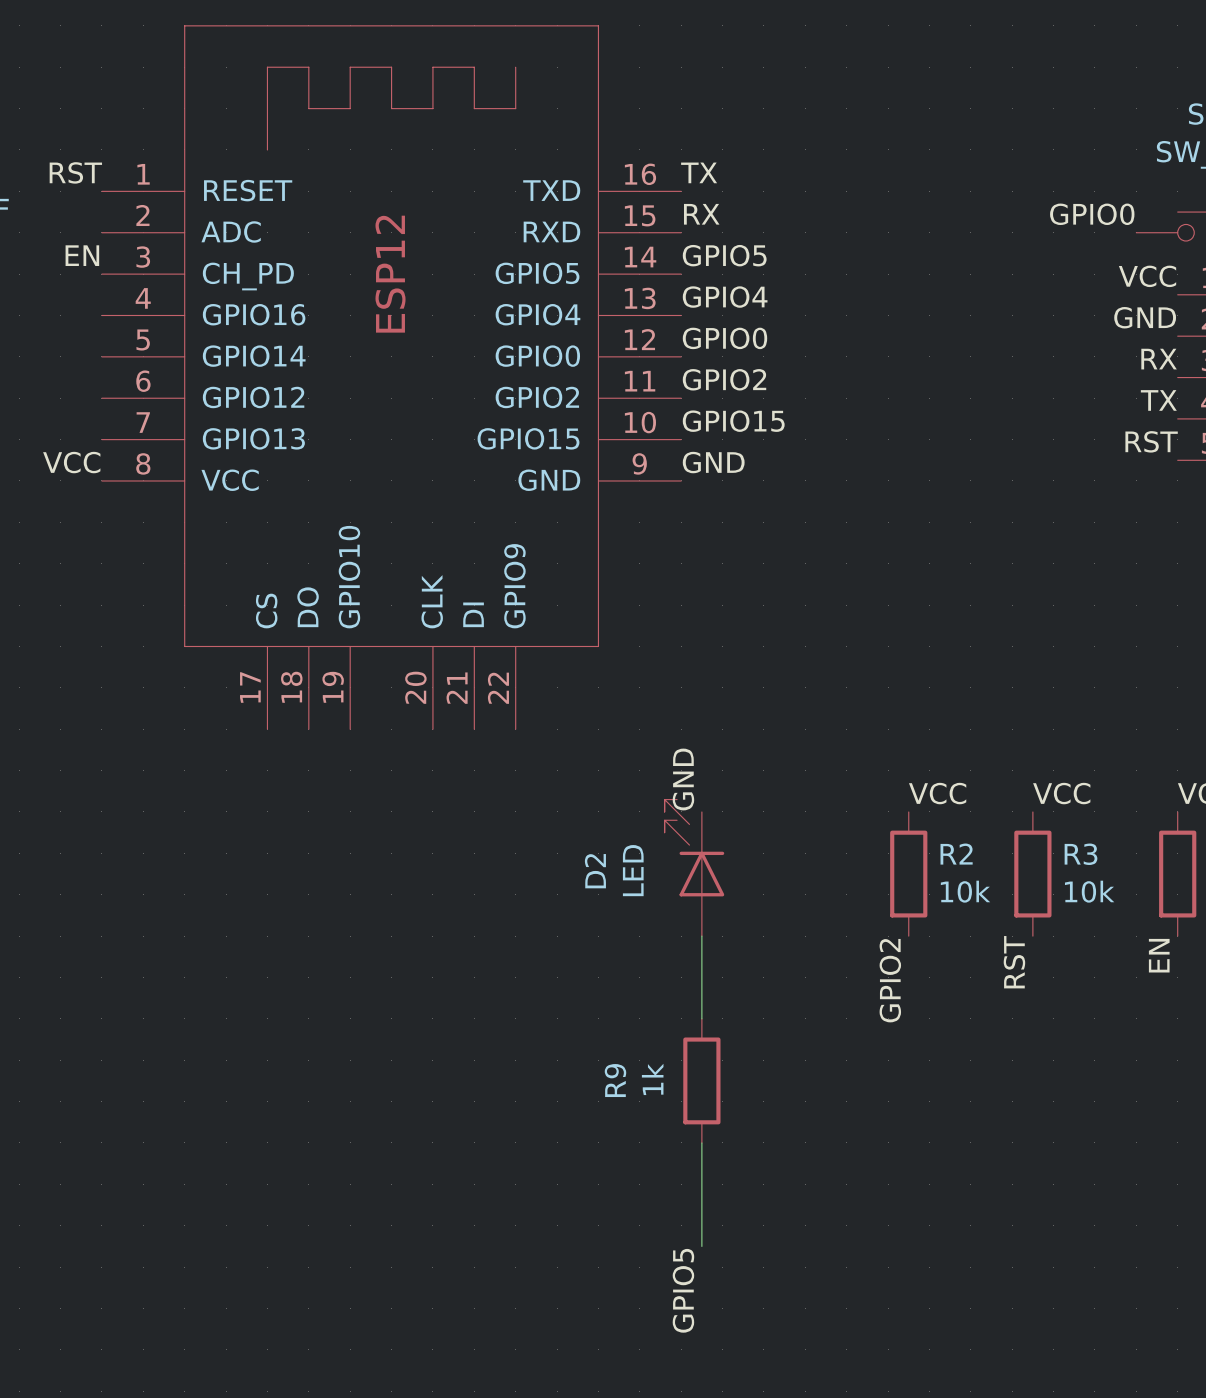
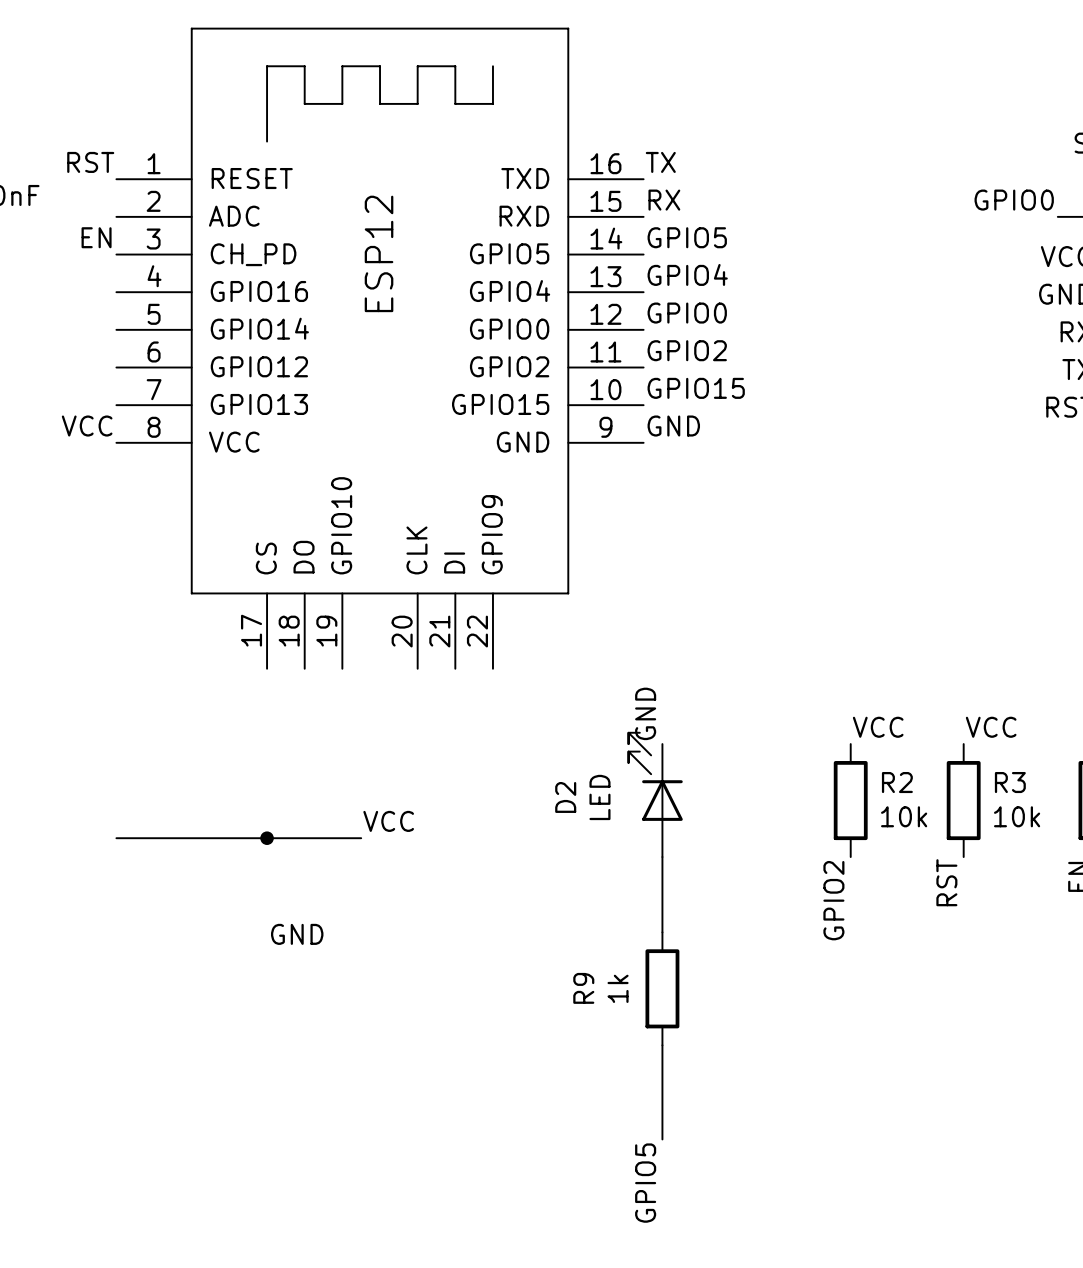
label: none -> VCC (388, 821)
wire: none -> (116, 838) (361, 838)
junction: none -> (267, 838)
label: none -> GND (297, 934)

